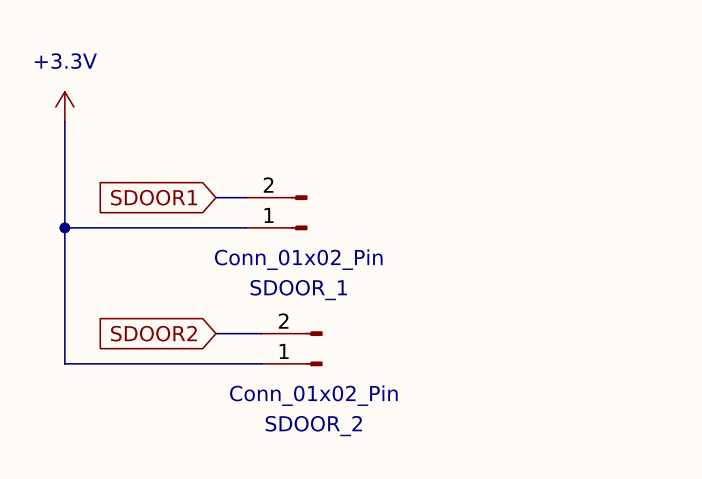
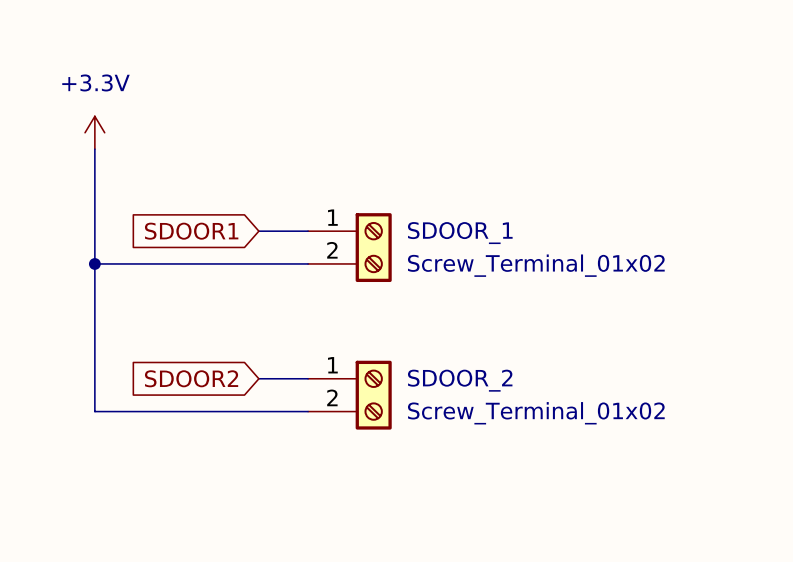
SDOOR_1 symbol: [246, 195, 308, 231] -> [308, 213, 392, 283]
SDOOR_1 value: Conn_01x02_Pin (298, 259) -> Screw_Terminal_01x02 (536, 265)
SDOOR_1 name position: SDOOR_1 (298, 290) -> SDOOR_1 (460, 233)
SDOOR_2 symbol: [261, 331, 323, 367] -> [308, 360, 392, 430]
SDOOR_2 value: Conn_01x02_Pin (313, 395) -> Screw_Terminal_01x02 (536, 413)
SDOOR_2 name position: SDOOR_2 (313, 426) -> SDOOR_2 (460, 380)

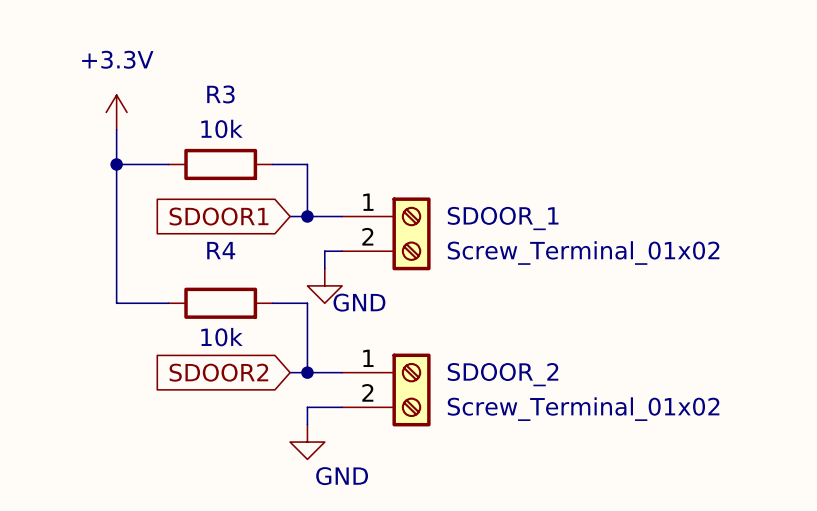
wire: none -> (116, 164) (168, 164)
junction: none -> (116, 164)
R3: none -> 10k (220, 164)
wire: none -> (272, 164) (307, 164) (307, 216)
junction: none -> (307, 216)
wire: (94, 263) (291, 263) -> (324, 268) (324, 251)
junction: (94, 263) -> none
power symbol: none -> GND (324, 285)
wire: (94, 313) (94, 411) (275, 411) -> (116, 303) (168, 303)
R4: none -> 10k (220, 303)
wire: none -> (272, 303) (307, 303) (307, 372)
junction: none -> (307, 372)
wire: none -> (307, 407) (307, 424)
power symbol: none -> GND (307, 442)

